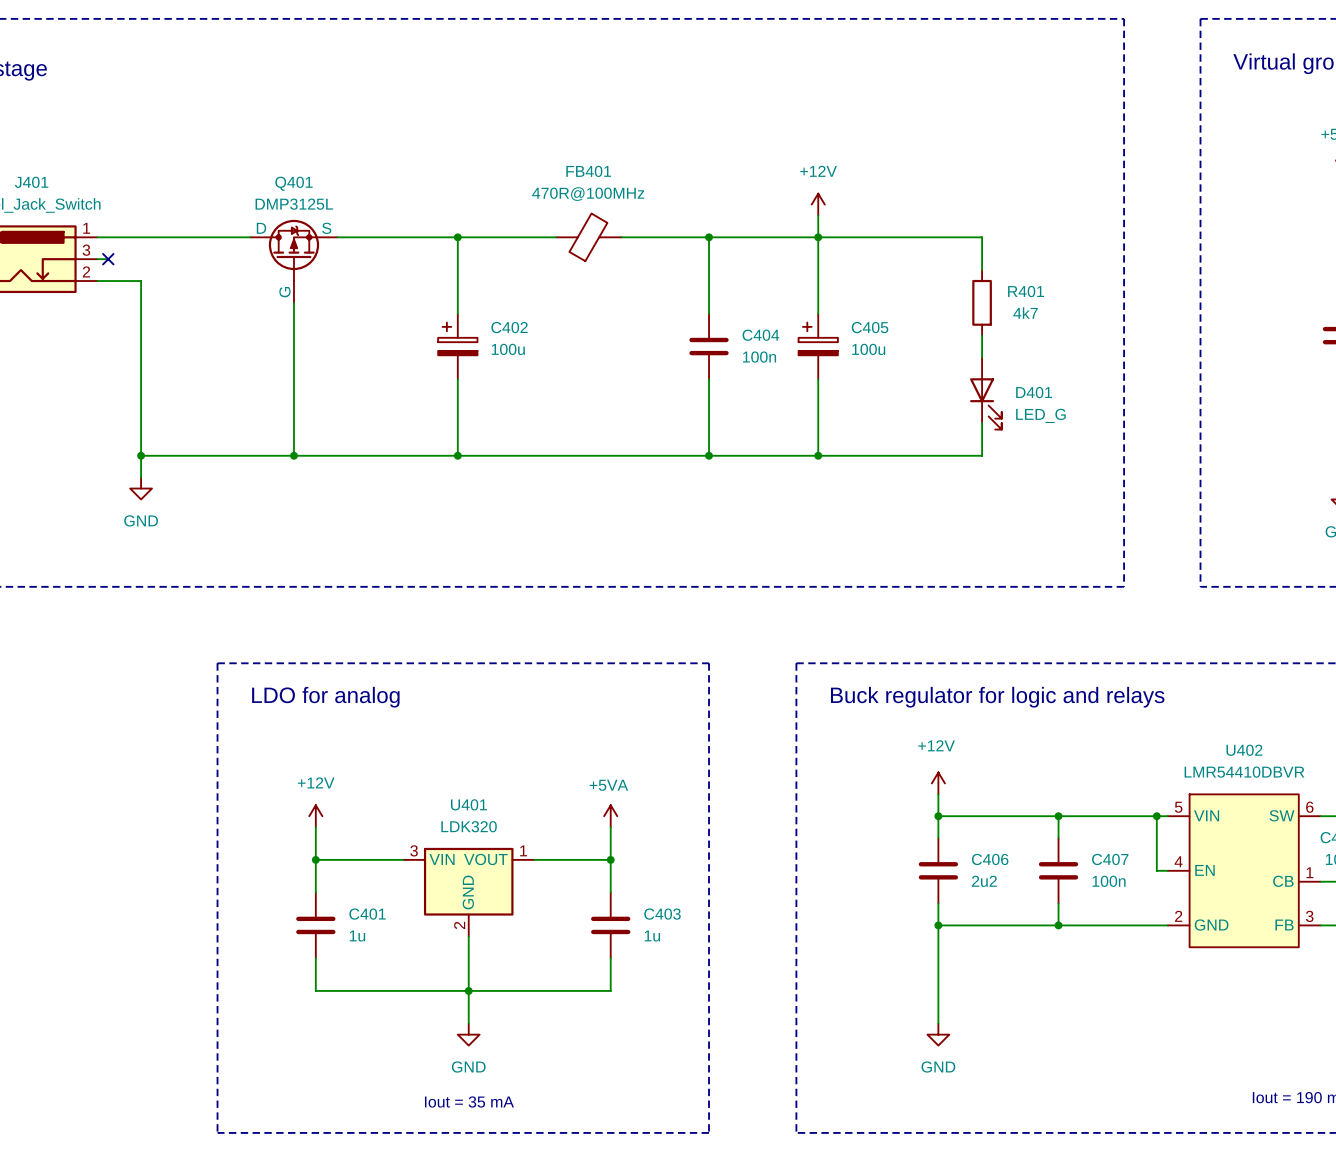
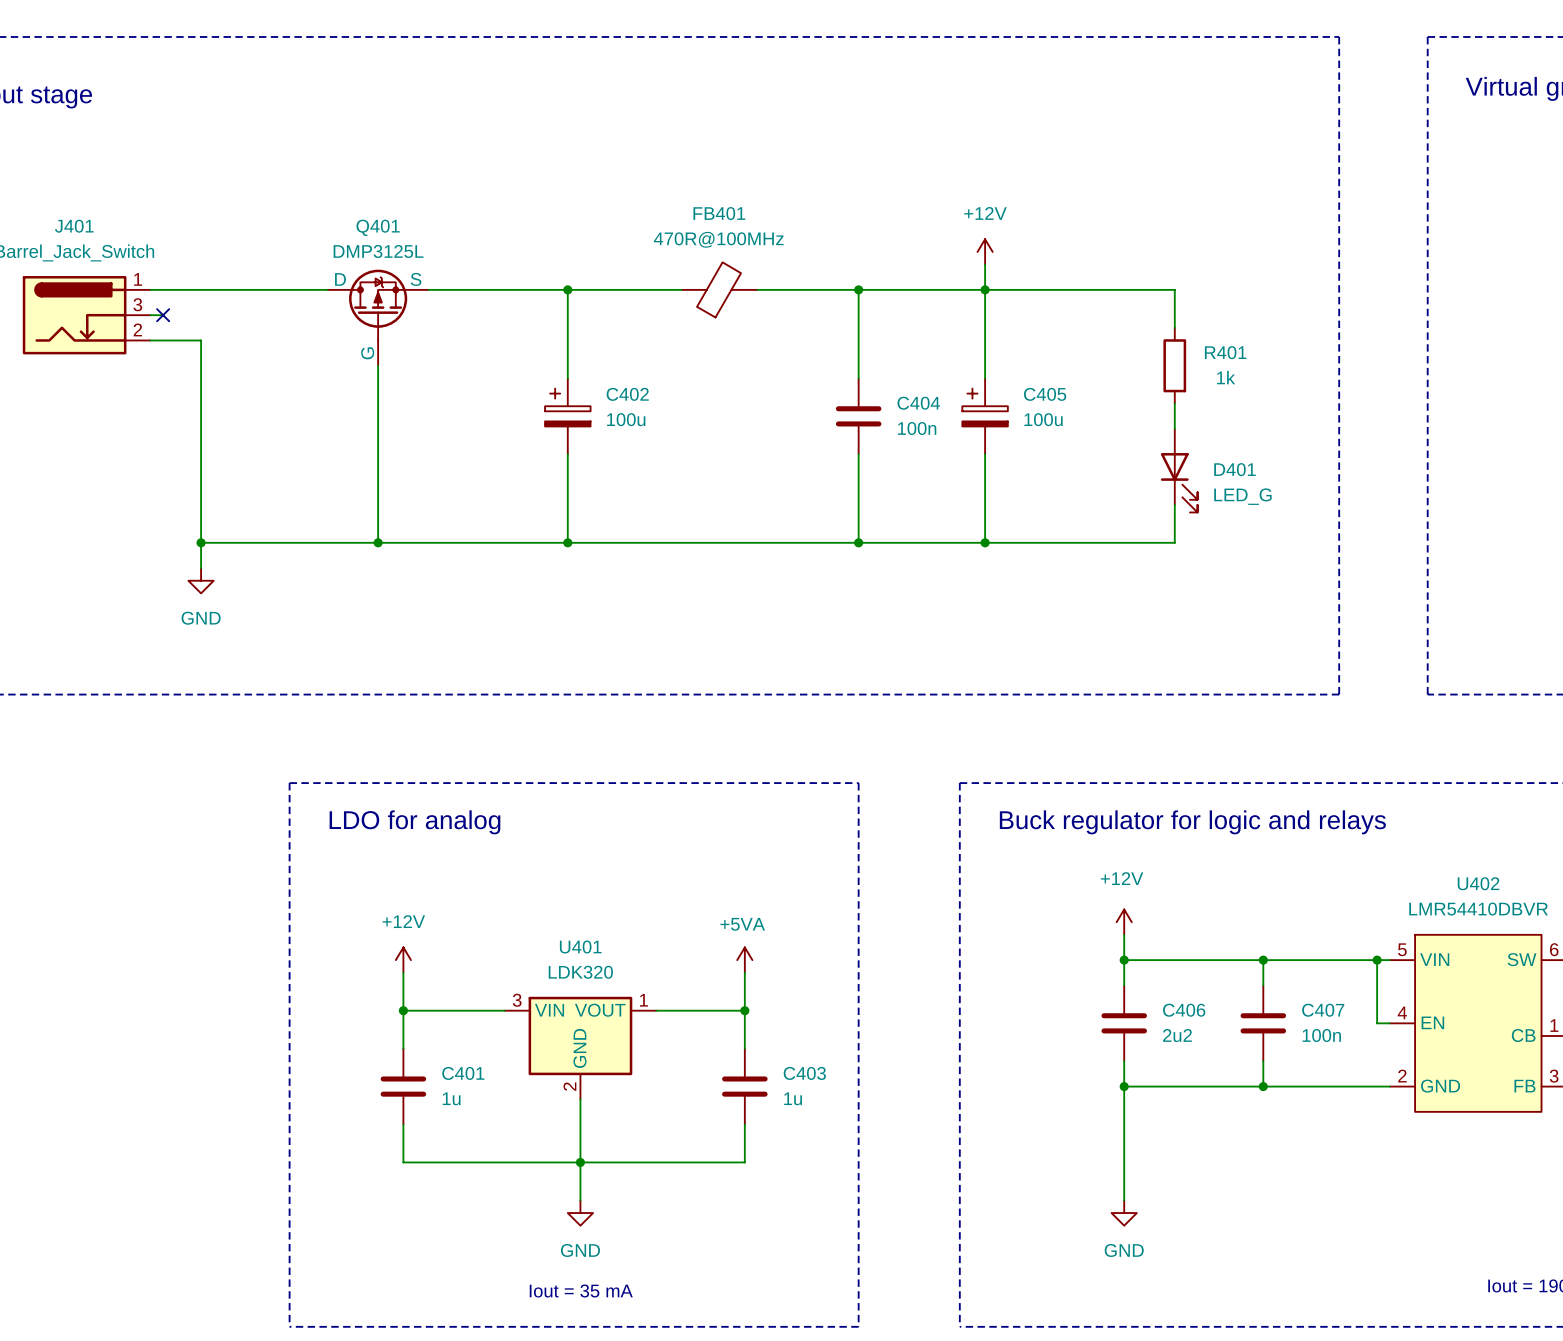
R401 value: 4k7 (1025, 313) -> 1k (1226, 377)

